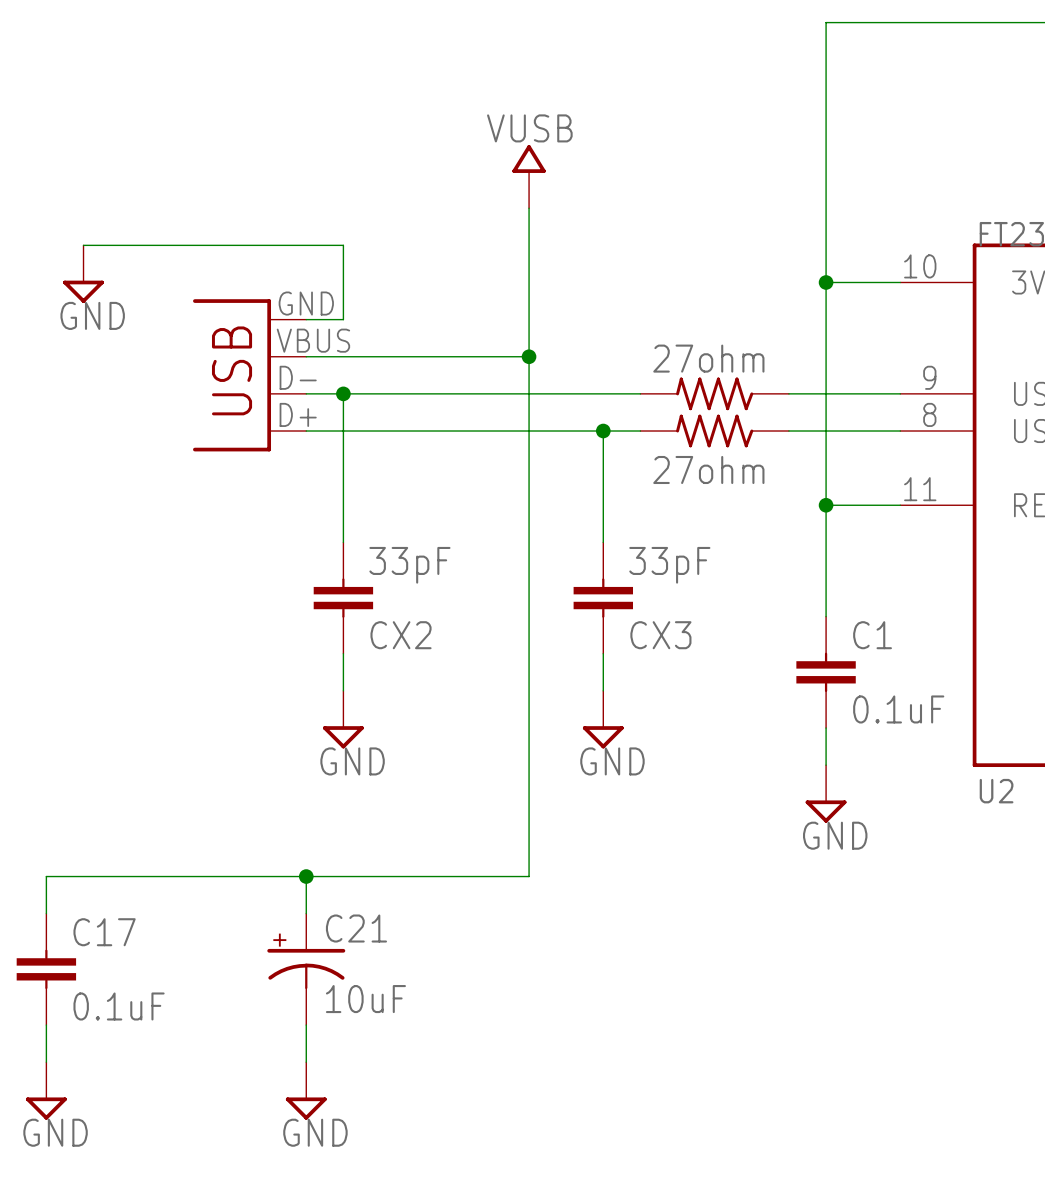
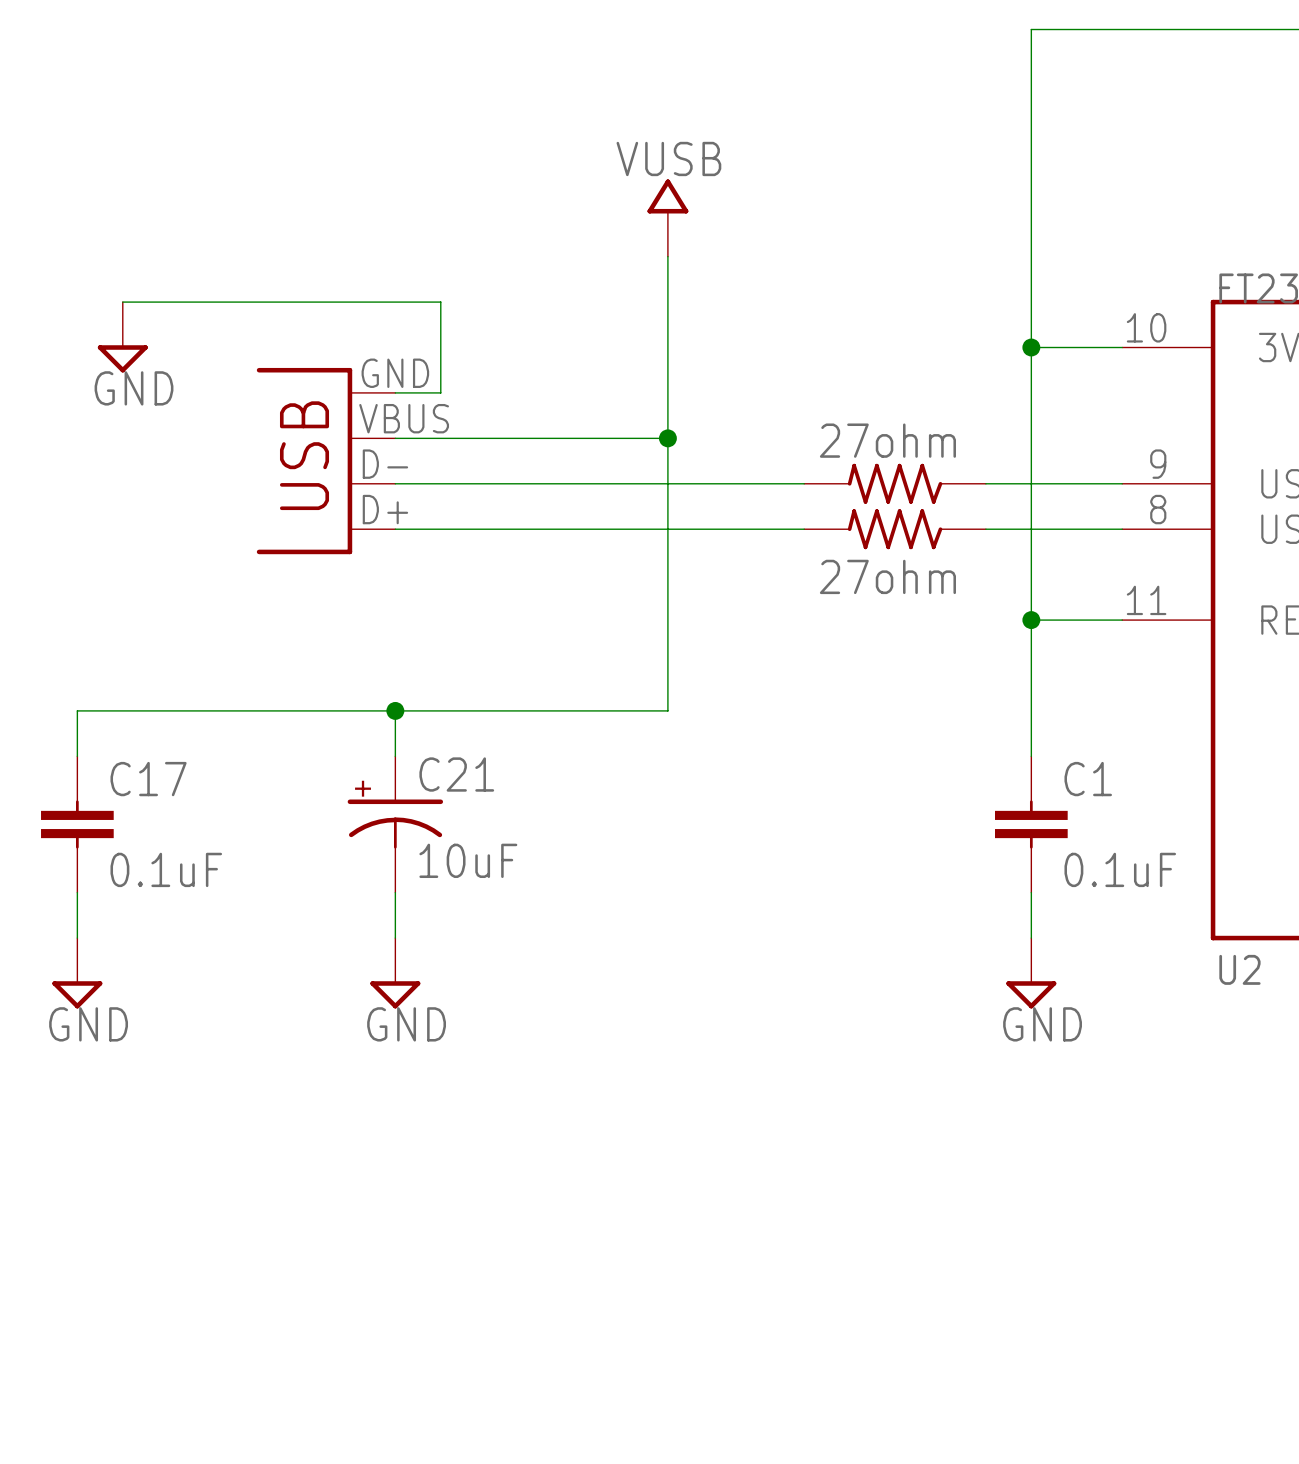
wire: (343, 393) (343, 542) -> none
junction: (343, 393) -> none
wire: (603, 431) (603, 542) -> none
junction: (603, 431) -> none
junction: none -> (395, 710)
wire: (529, 579) (529, 876) (46, 876) (46, 913) -> (667, 710) (77, 710) (77, 756)
CX2: 33pF (343, 598) -> none
CX3: 33pF (603, 598) -> none
wire: (343, 653) (343, 690) -> none
wire: (603, 653) (603, 690) -> none
power symbol position: GND (343, 719) -> GND (395, 973)
power symbol: GND (603, 719) -> none
power symbol: none -> GND (77, 973)
wire: (306, 876) (306, 913) -> (395, 710) (395, 756)
junction: (306, 876) -> none
C17 position: (46, 969) -> (77, 824)
C21 position: (306, 969) -> (395, 824)
wire: (46, 1025) (46, 1062) -> (77, 892) (77, 938)
wire: (306, 1025) (306, 1062) -> (395, 892) (395, 938)
power symbol: GND (46, 1090) -> none
power symbol: GND (306, 1090) -> none

